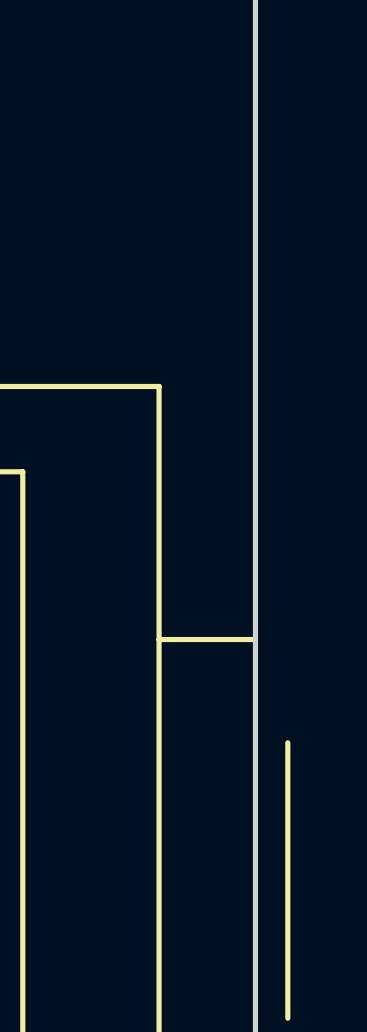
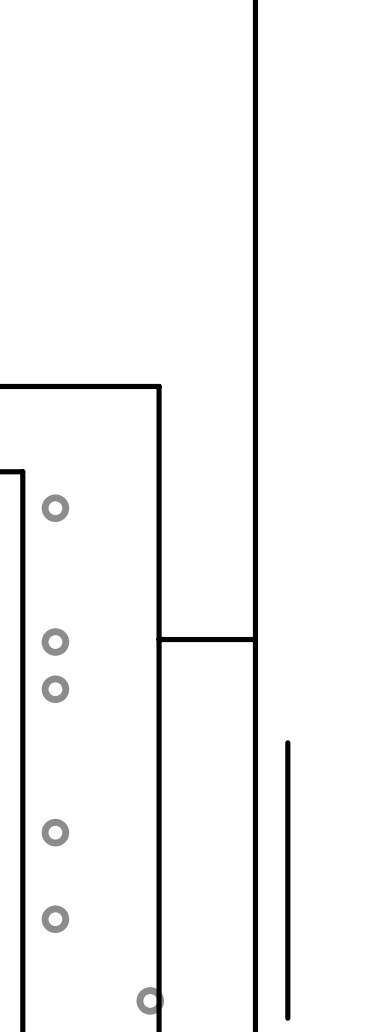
via: none -> (55, 508)
via: none -> (55, 642)
via: none -> (55, 689)
via: none -> (55, 832)
via: none -> (55, 919)
via: none -> (150, 1000)

